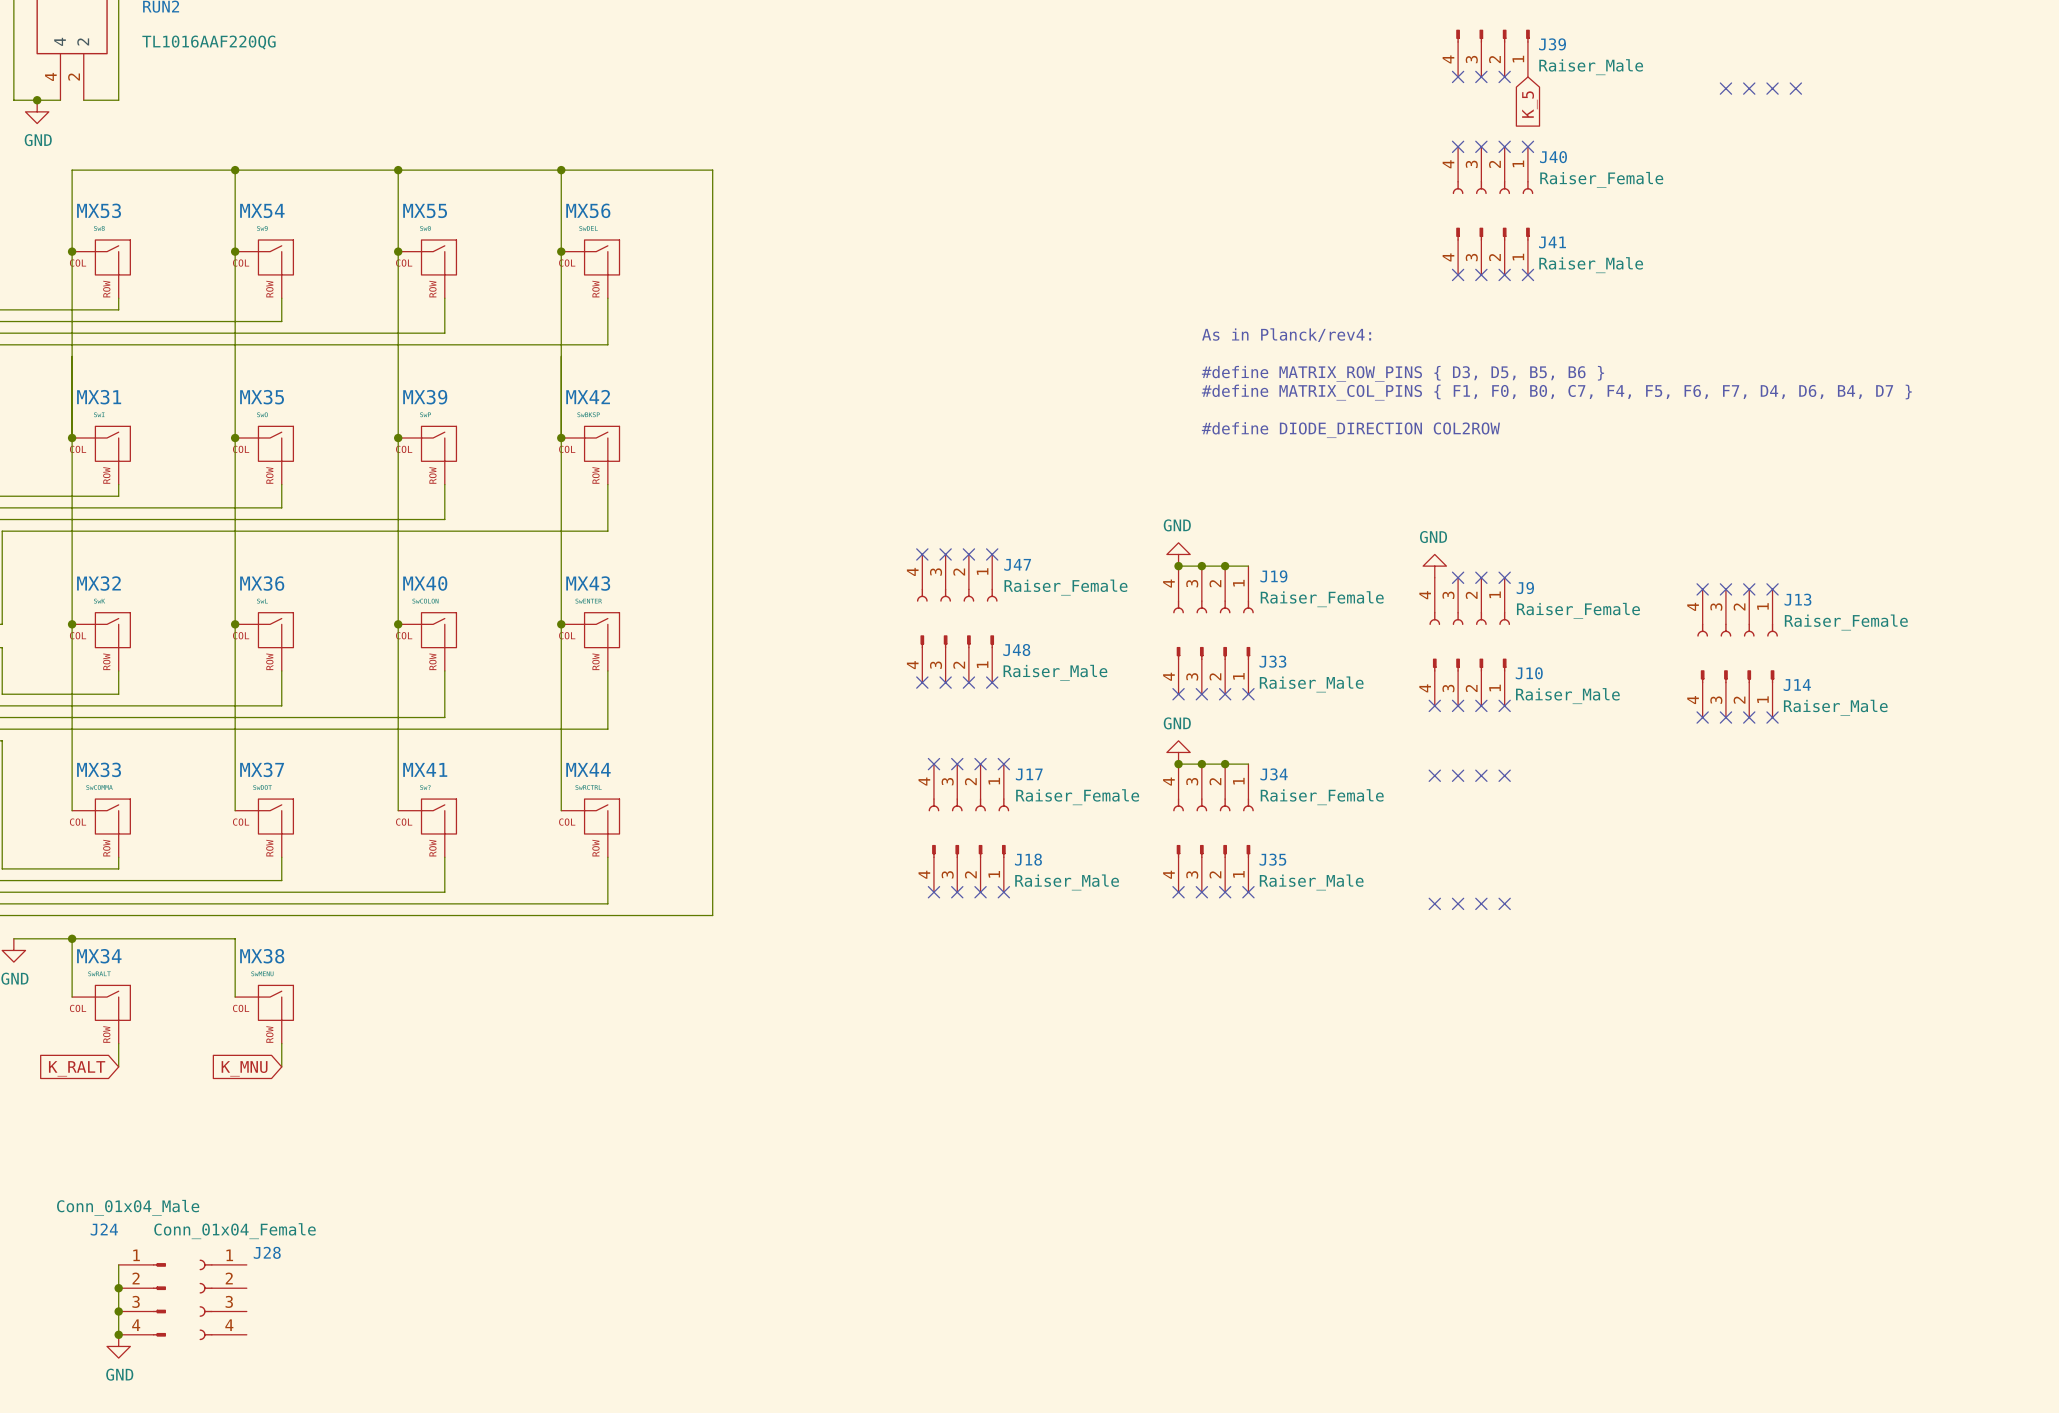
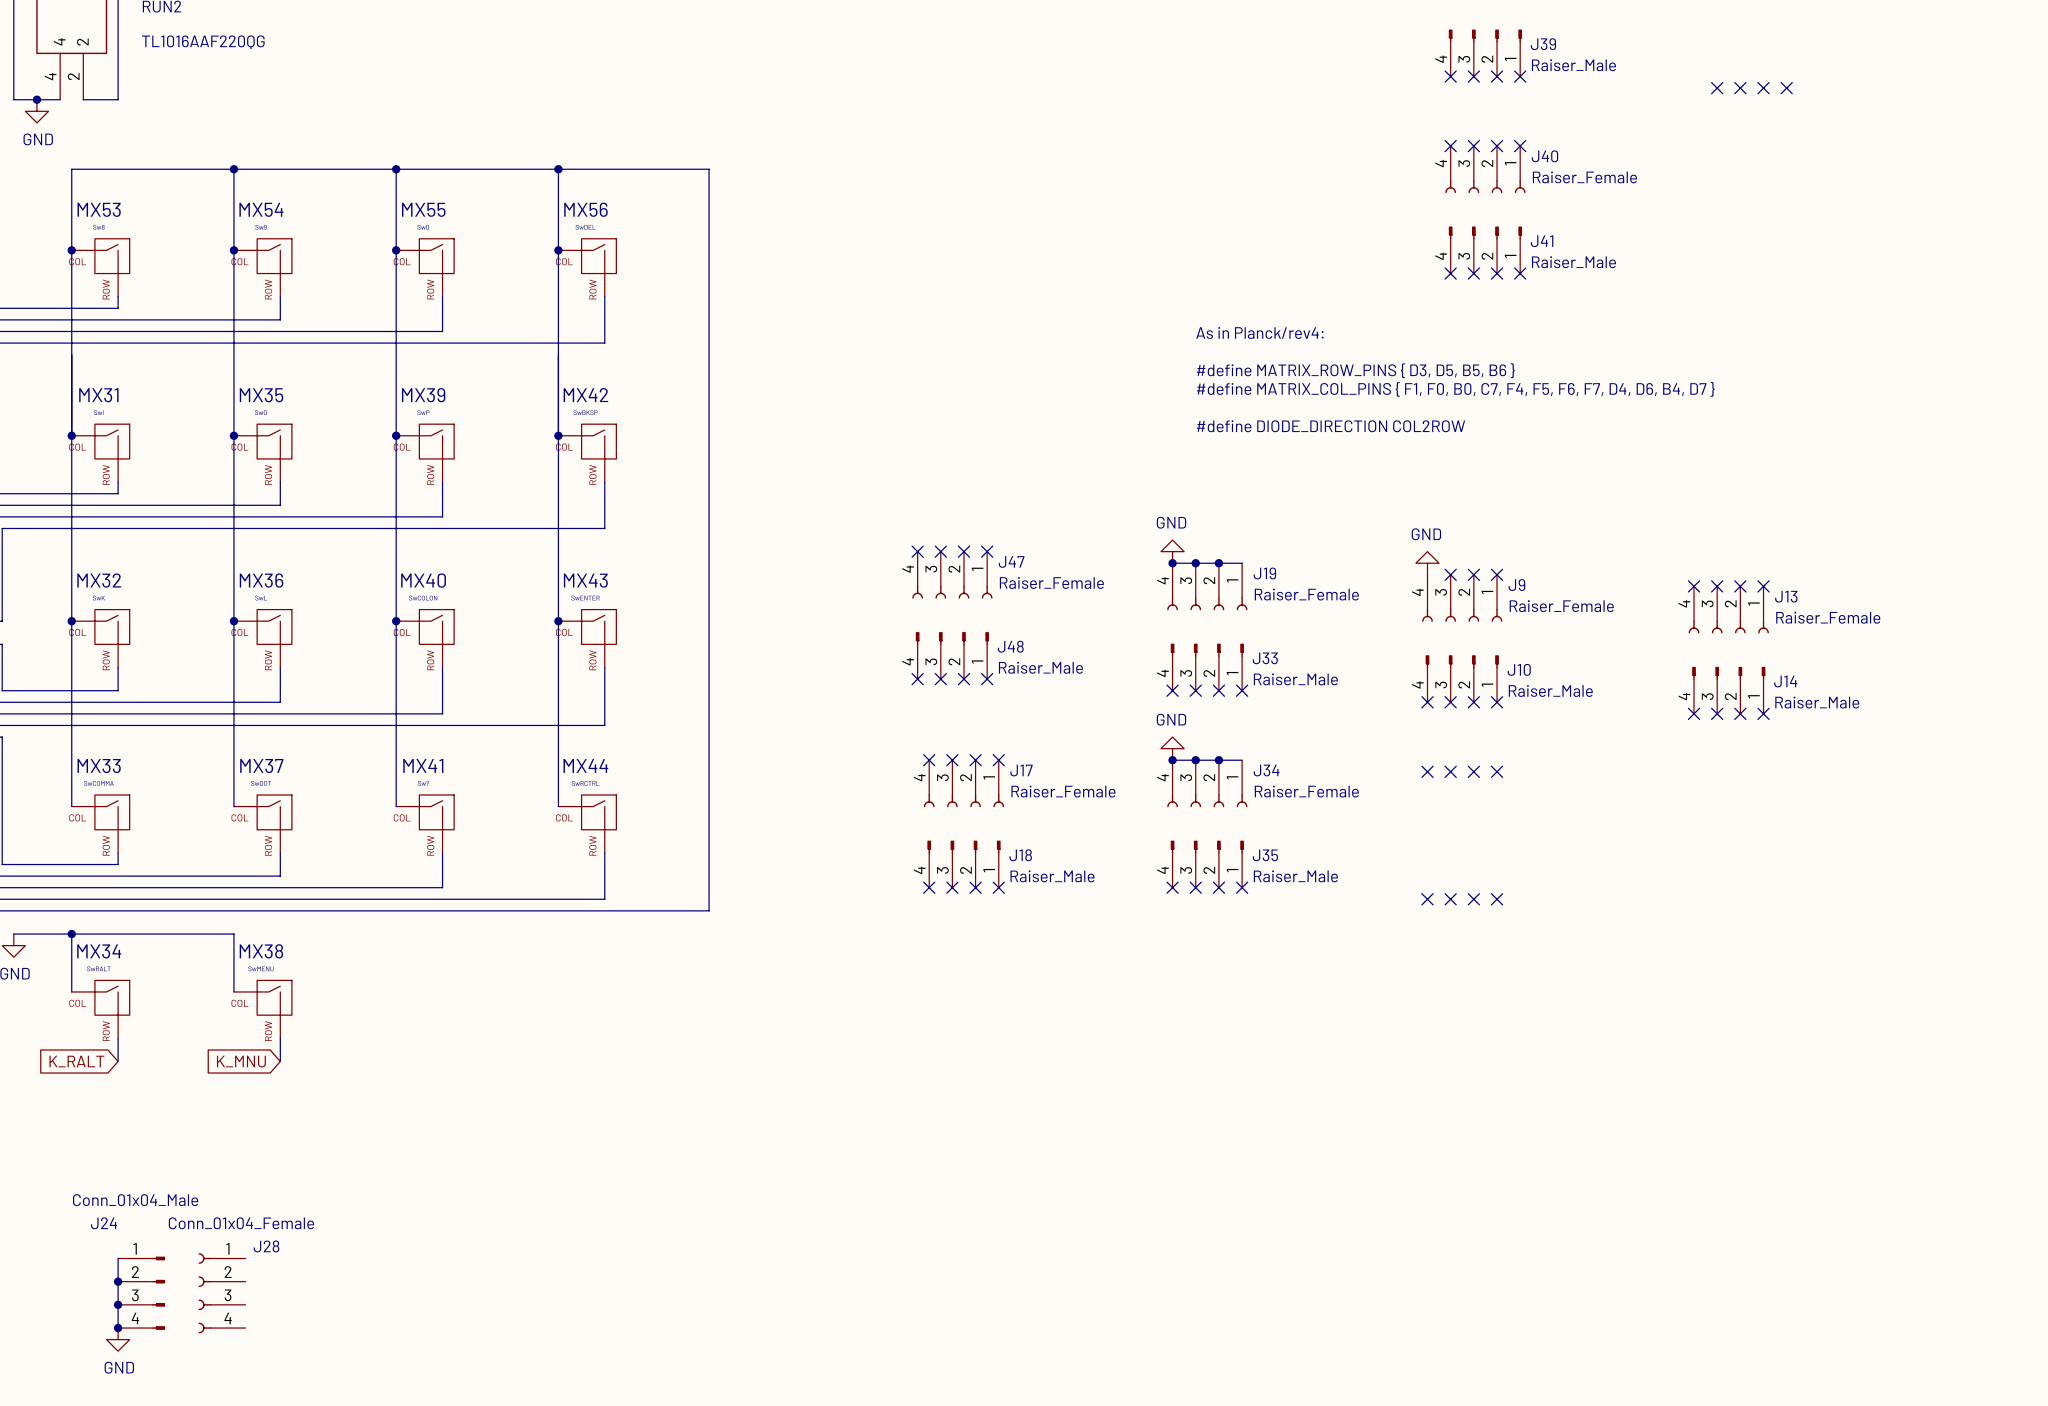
no-connect mark: none -> (1520, 76)
global label: K_5 (1529, 104) -> none

